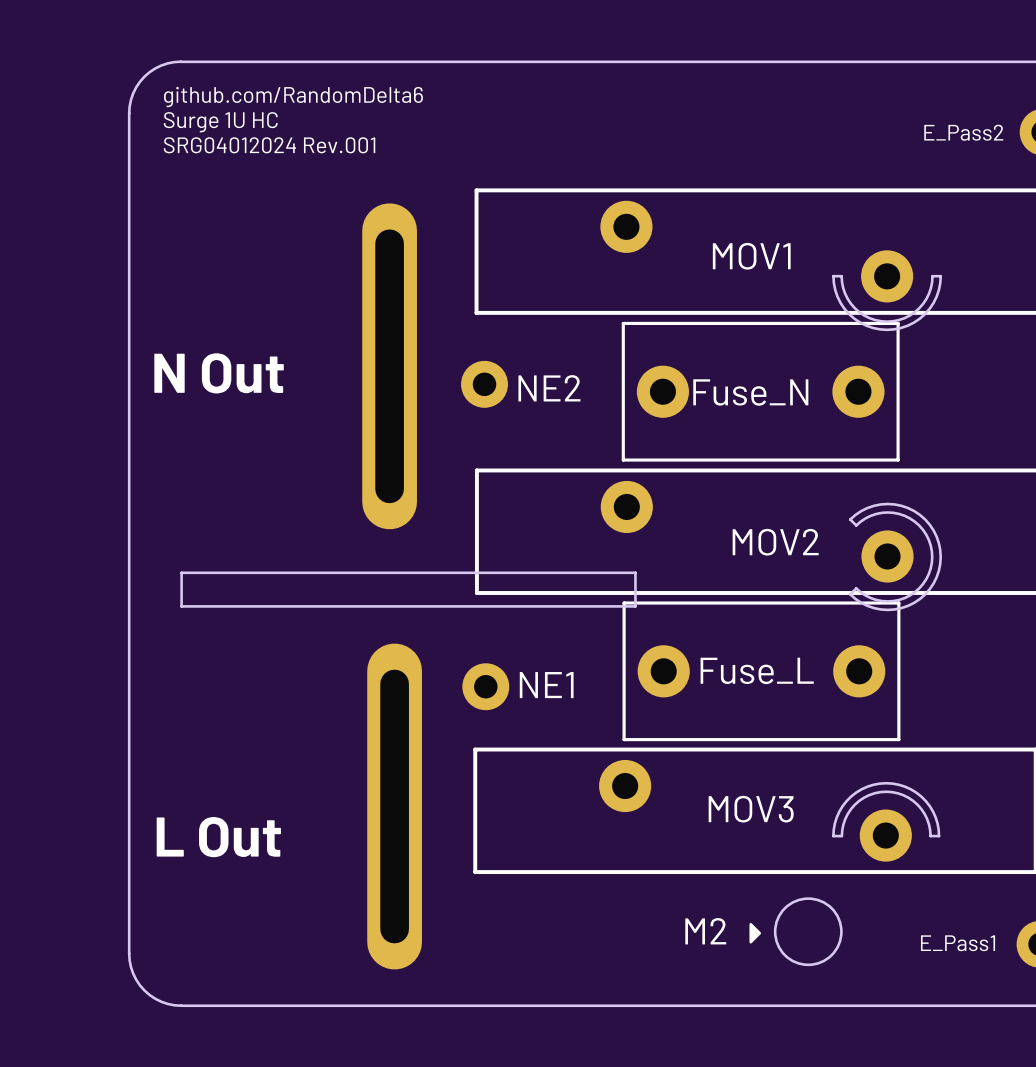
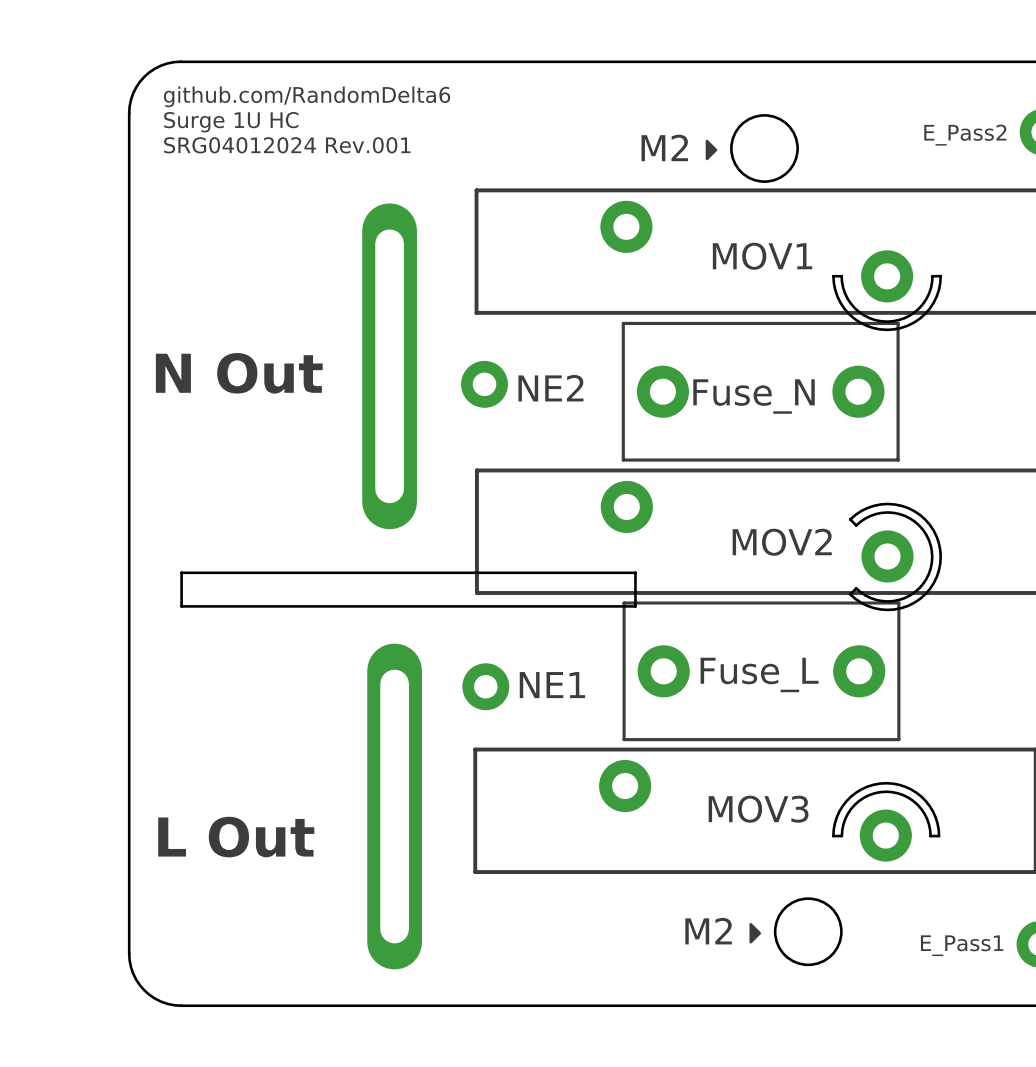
round board edge: none -> [730, 114, 799, 183]
drawing: none -> [705, 139, 718, 161]
text: none -> M2 (664, 147)

